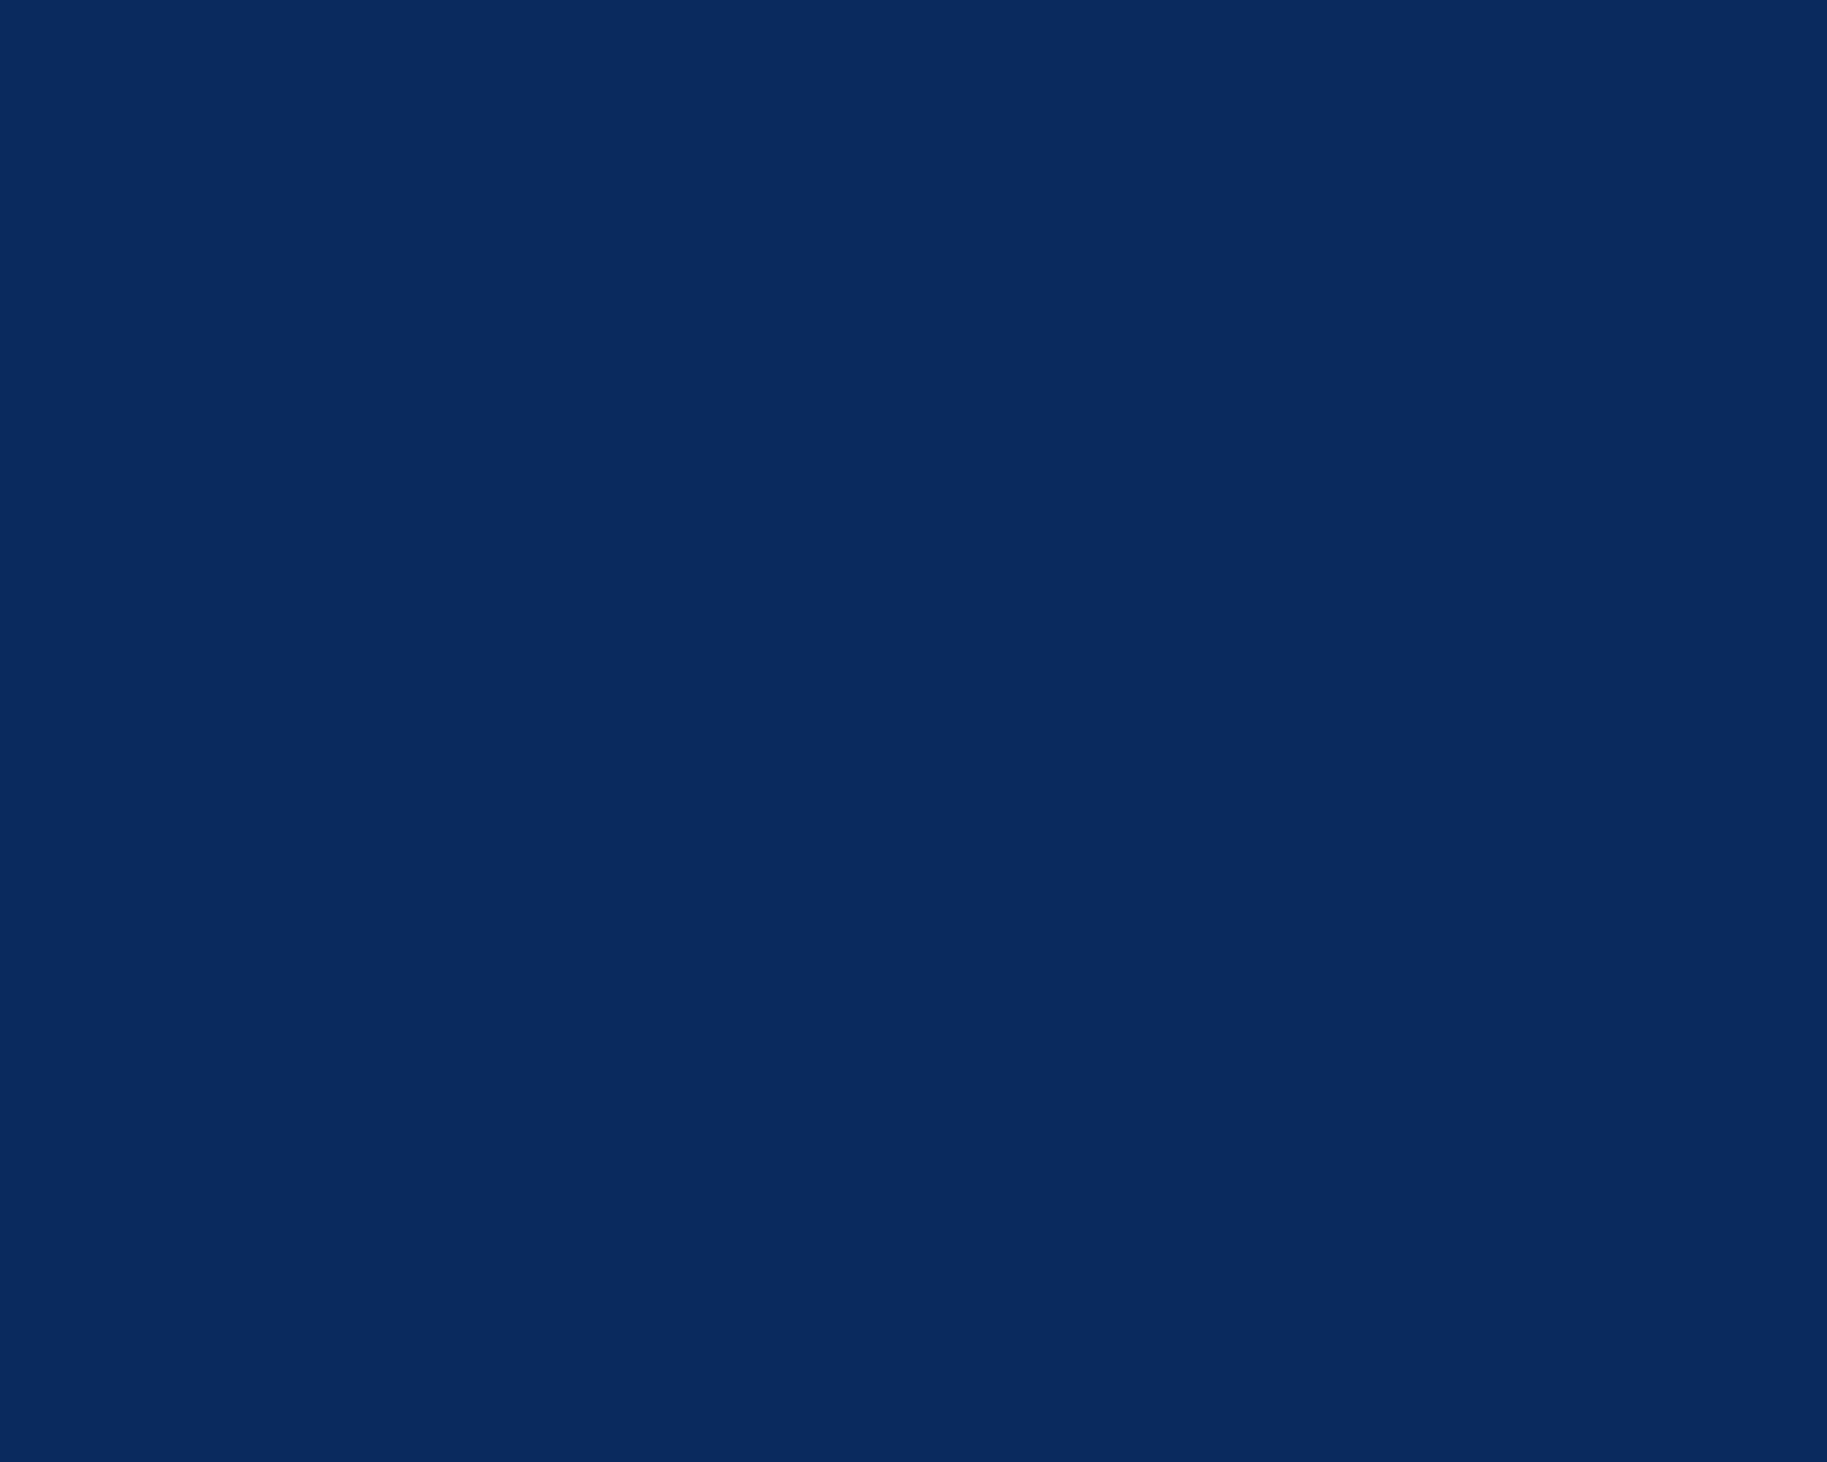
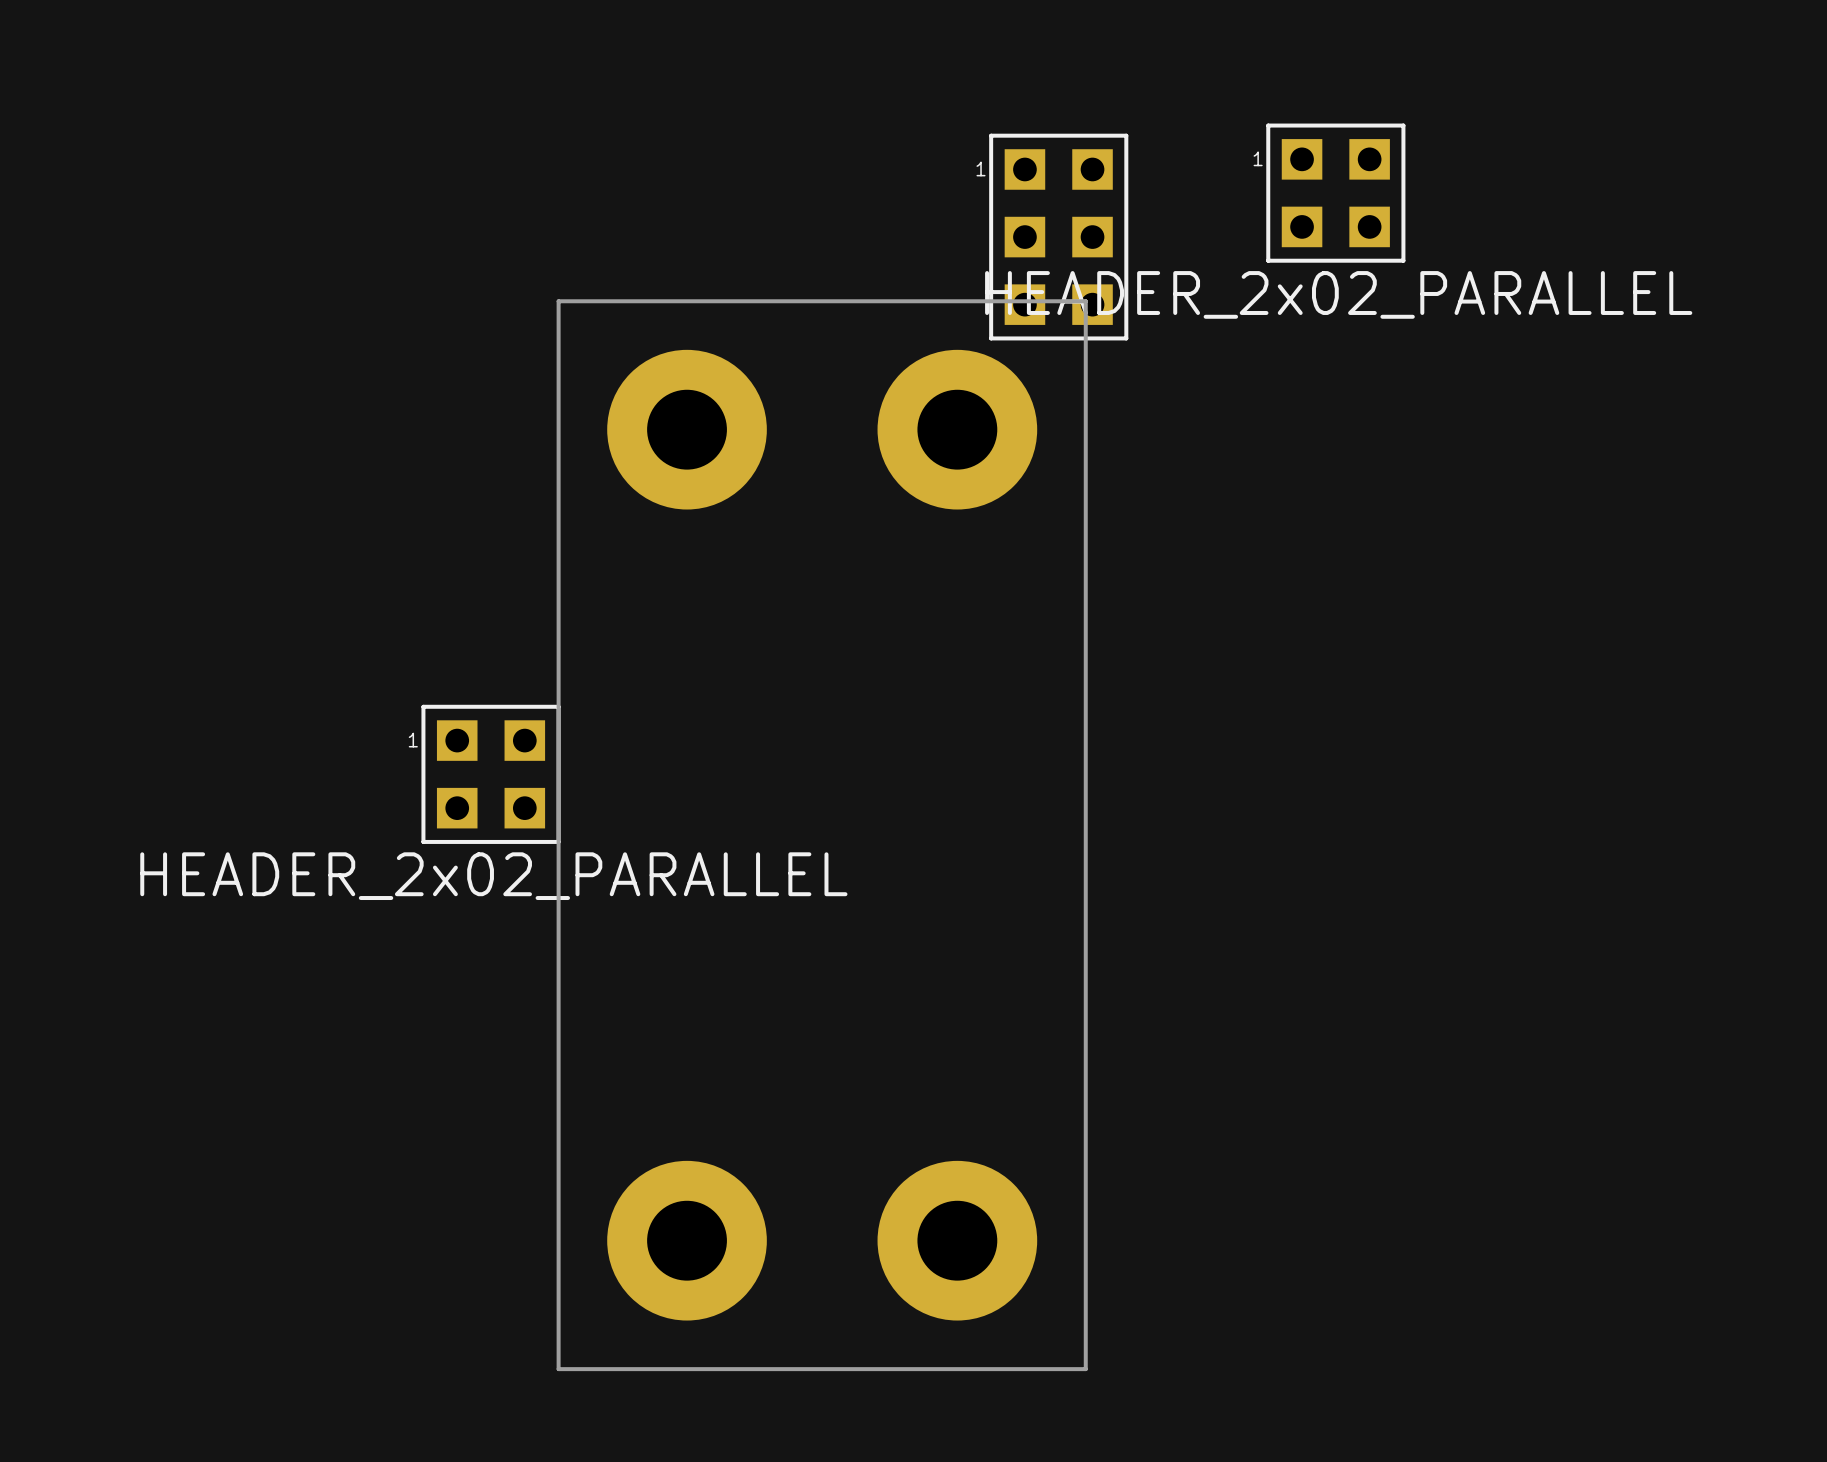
part: none -> HEADER_2x02_PARALLEL (1335, 193)
part: none -> (1058, 237)
board edge: none -> (558, 301) (1085, 301) (1085, 1369) (558, 1369) (558, 301)
part: none -> (687, 429)
part: none -> (957, 429)
part: none -> HEADER_2x02_PARALLEL (491, 774)
part: none -> (687, 1240)
part: none -> (957, 1240)

